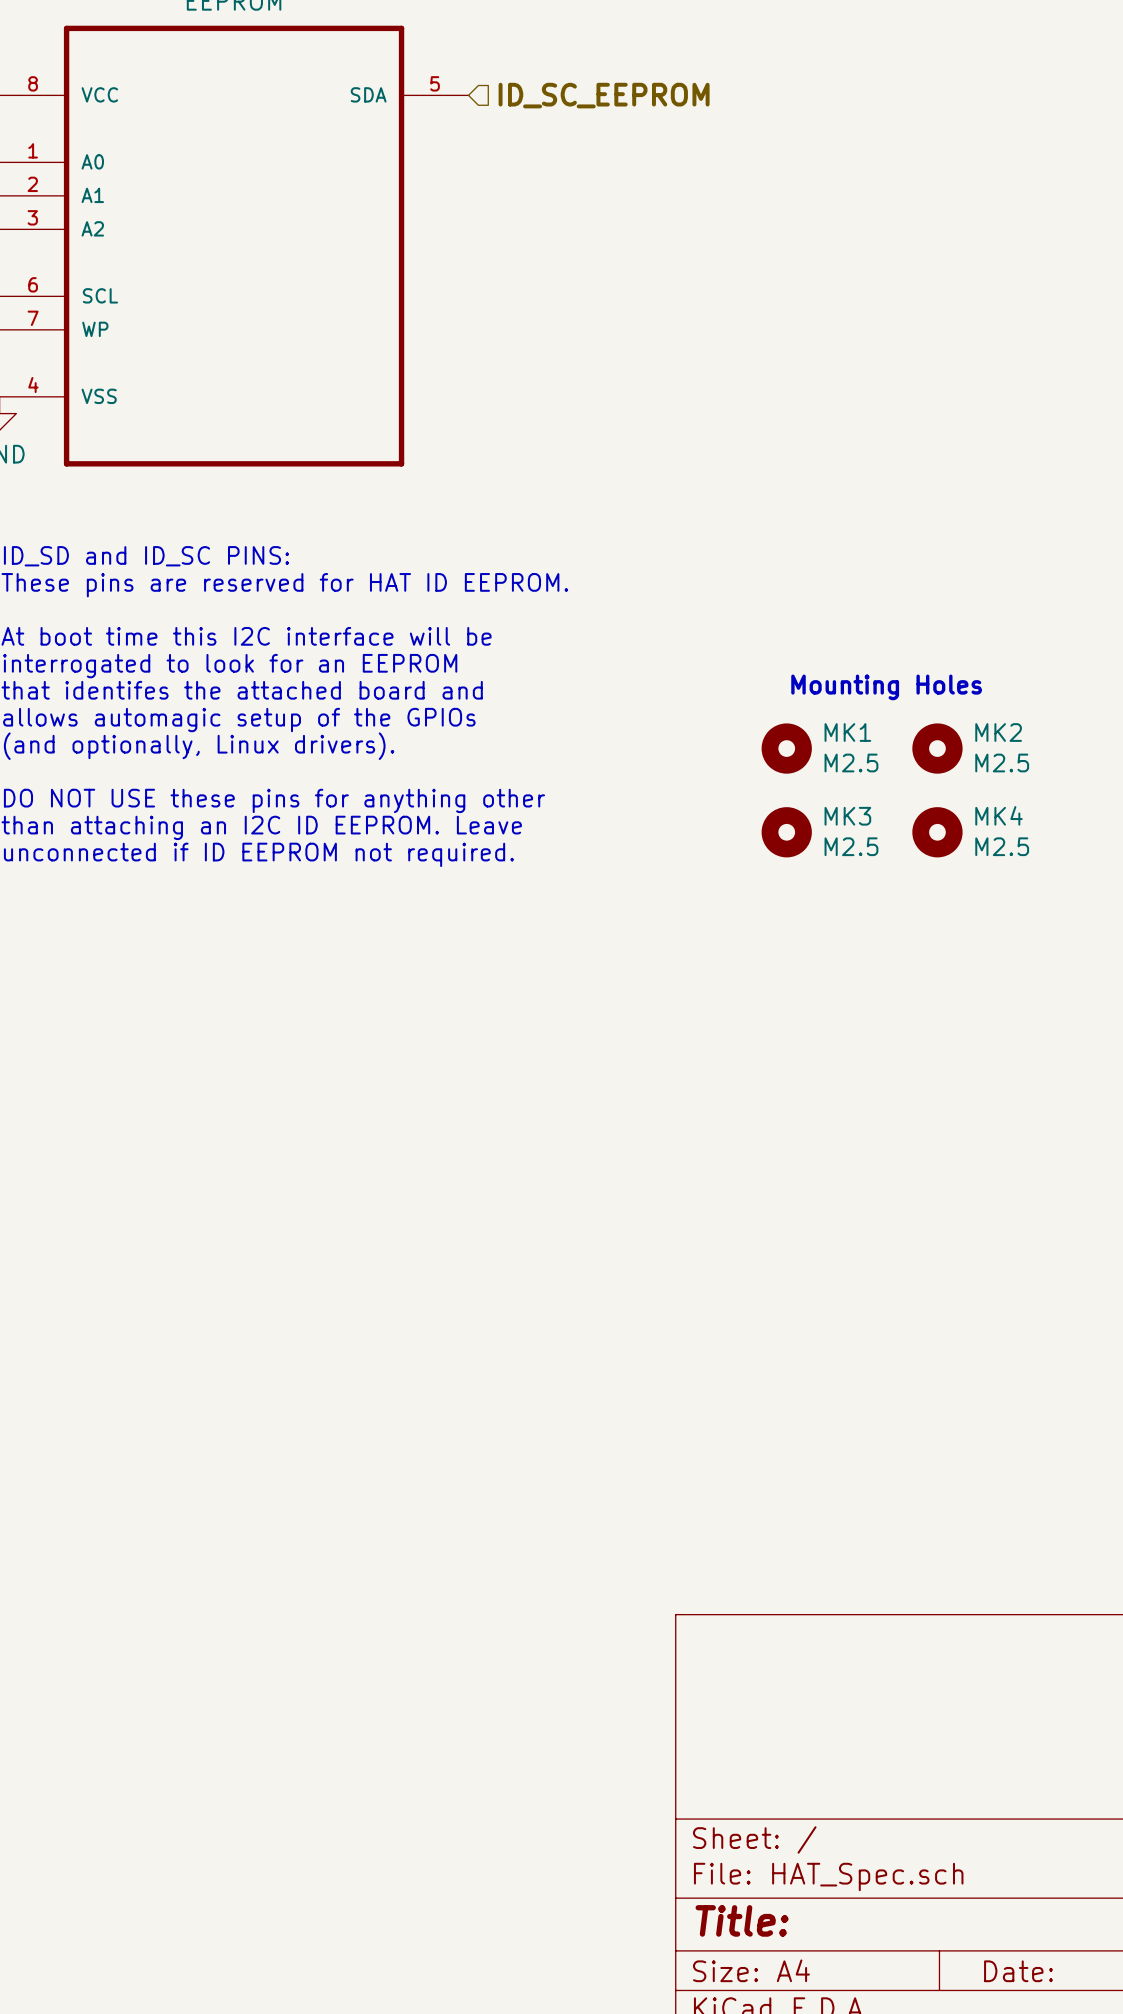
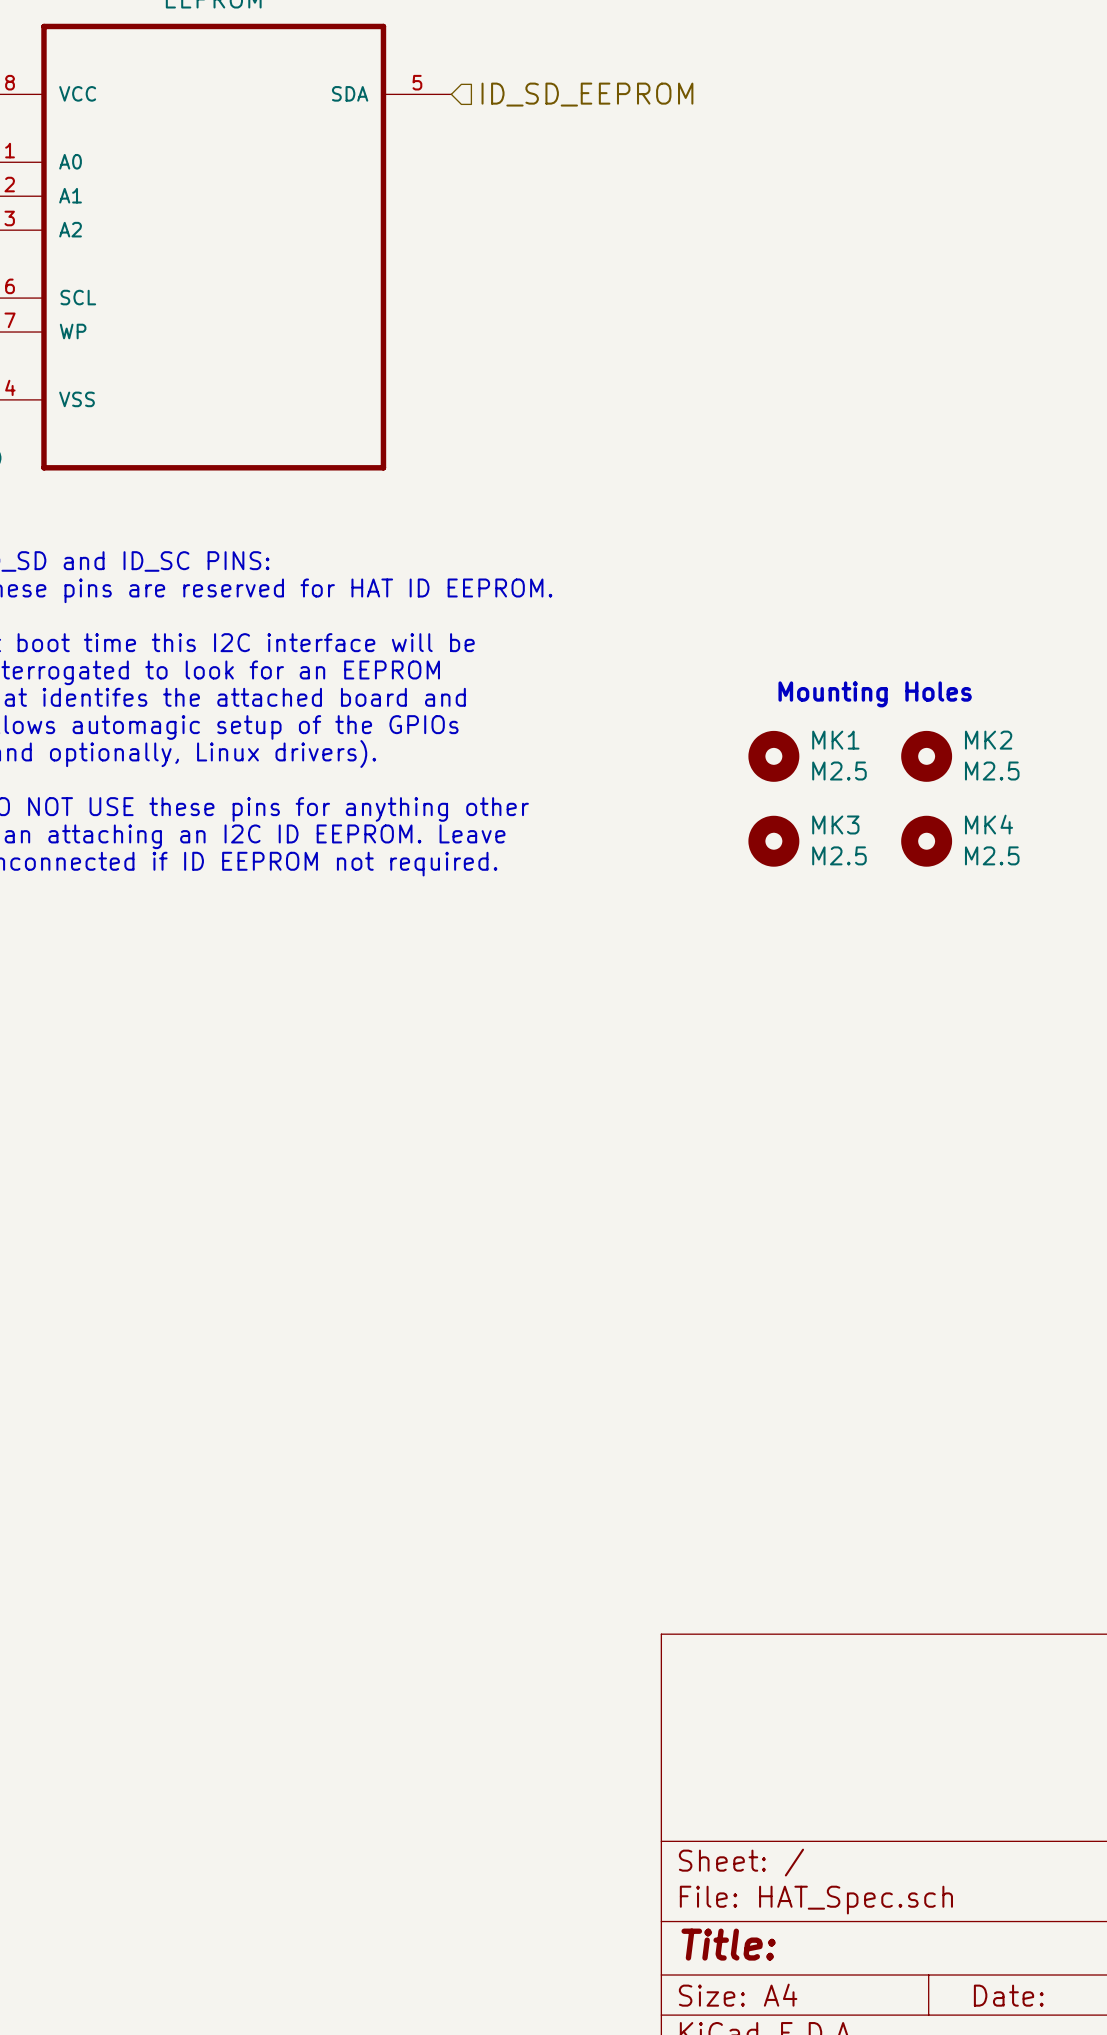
hierarchical label: ID_SC_EEPROM (604, 95) -> ID_SD_EEPROM (587, 94)

